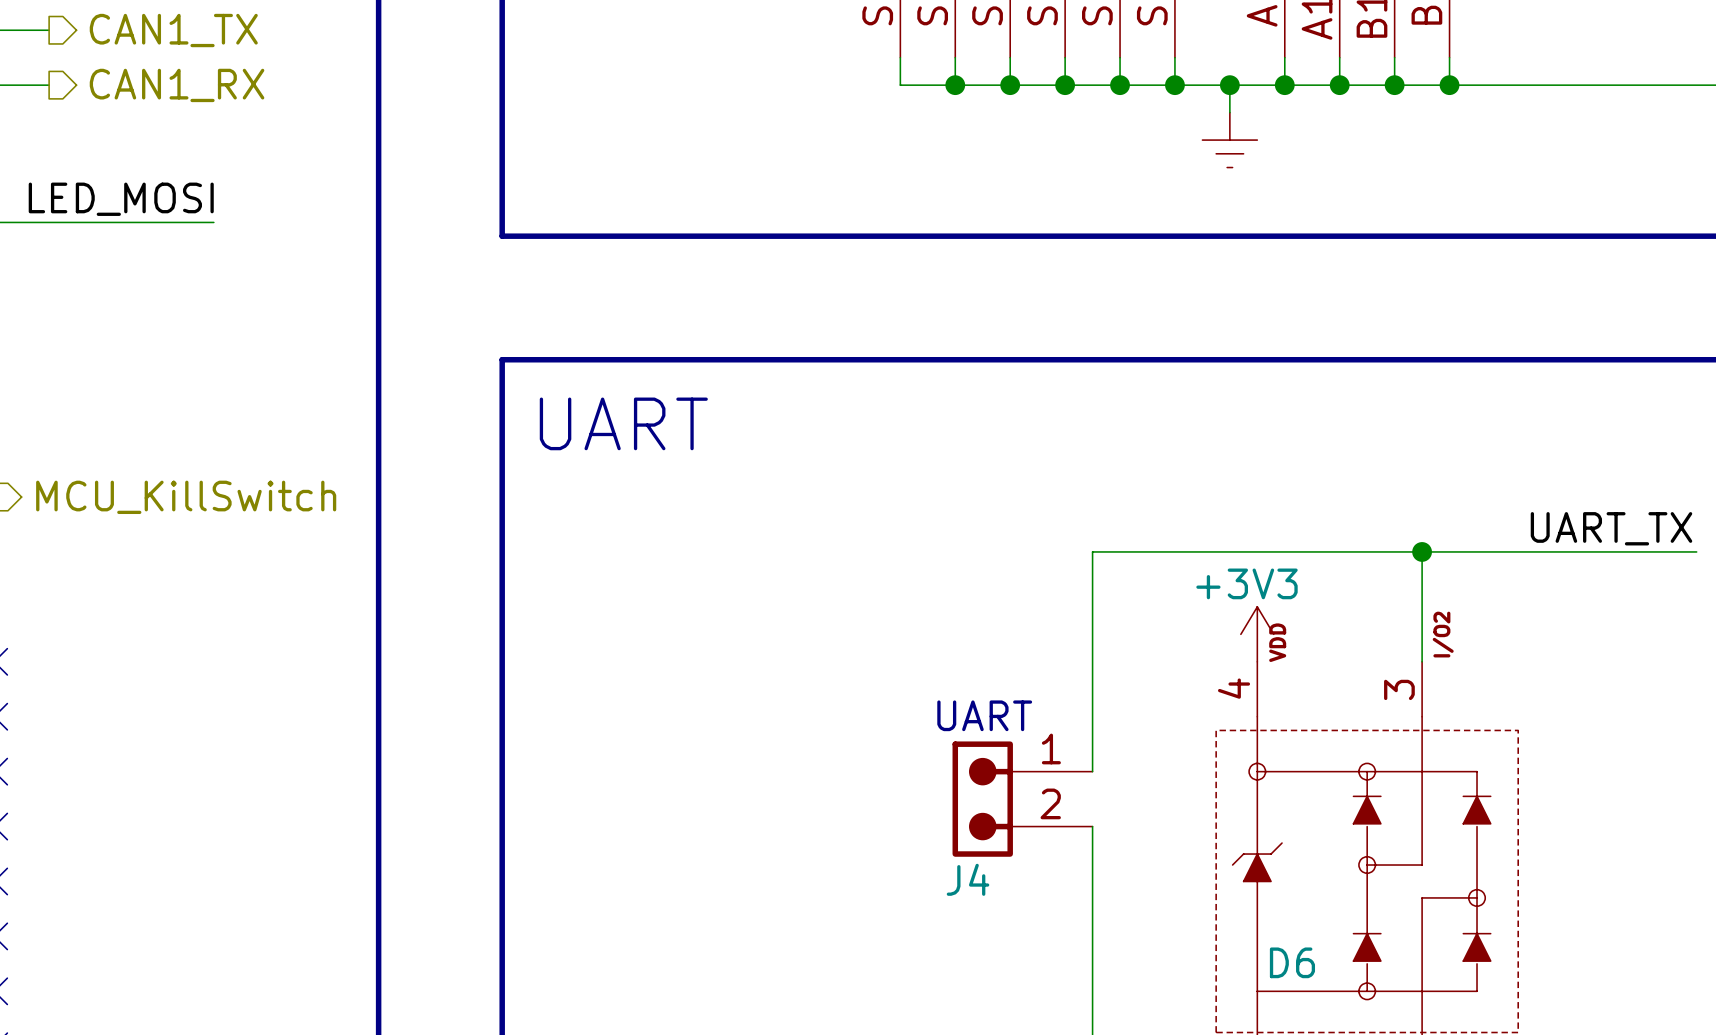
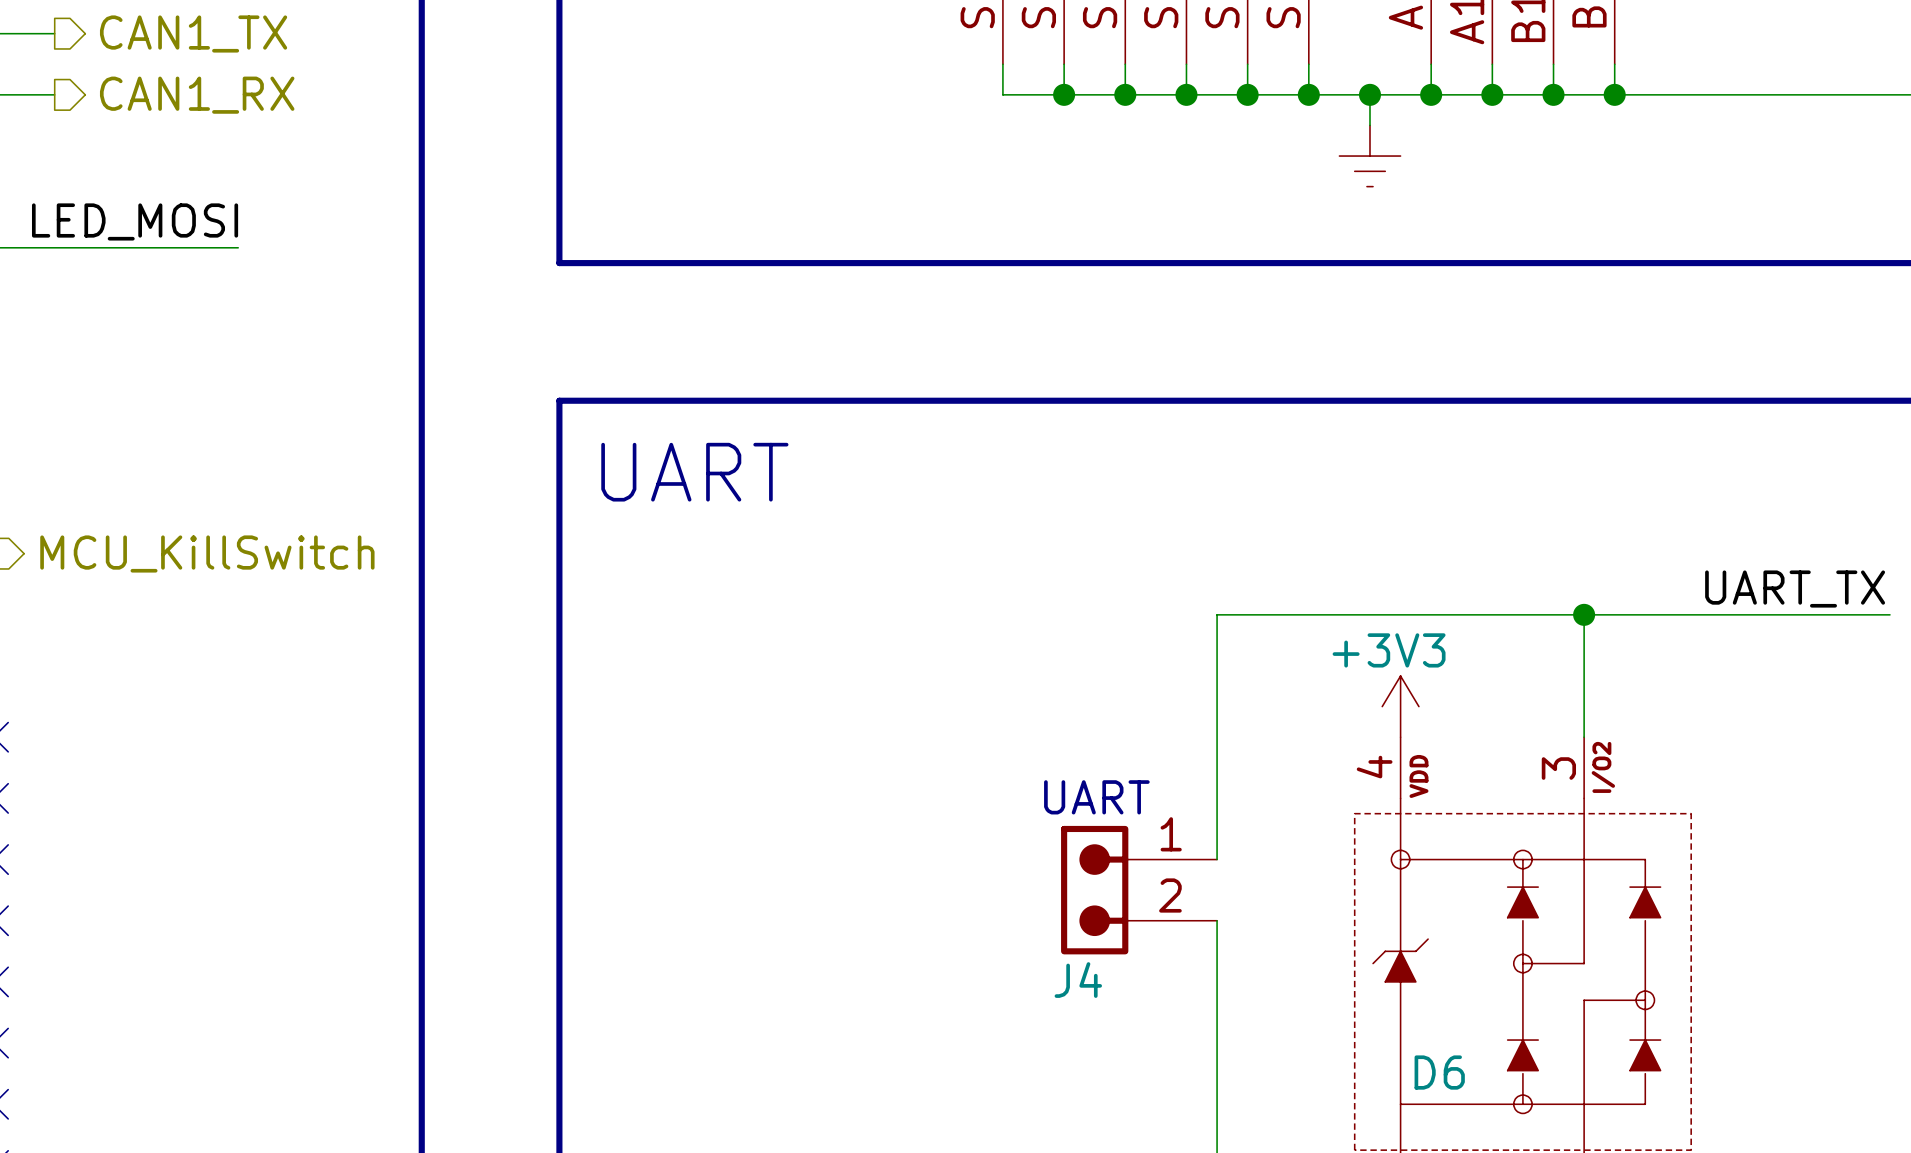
D6 text position: I/O2 (1443, 634) -> I/O2 (1603, 767)
D6 text position: VDD (1277, 642) -> VDD (1418, 776)

